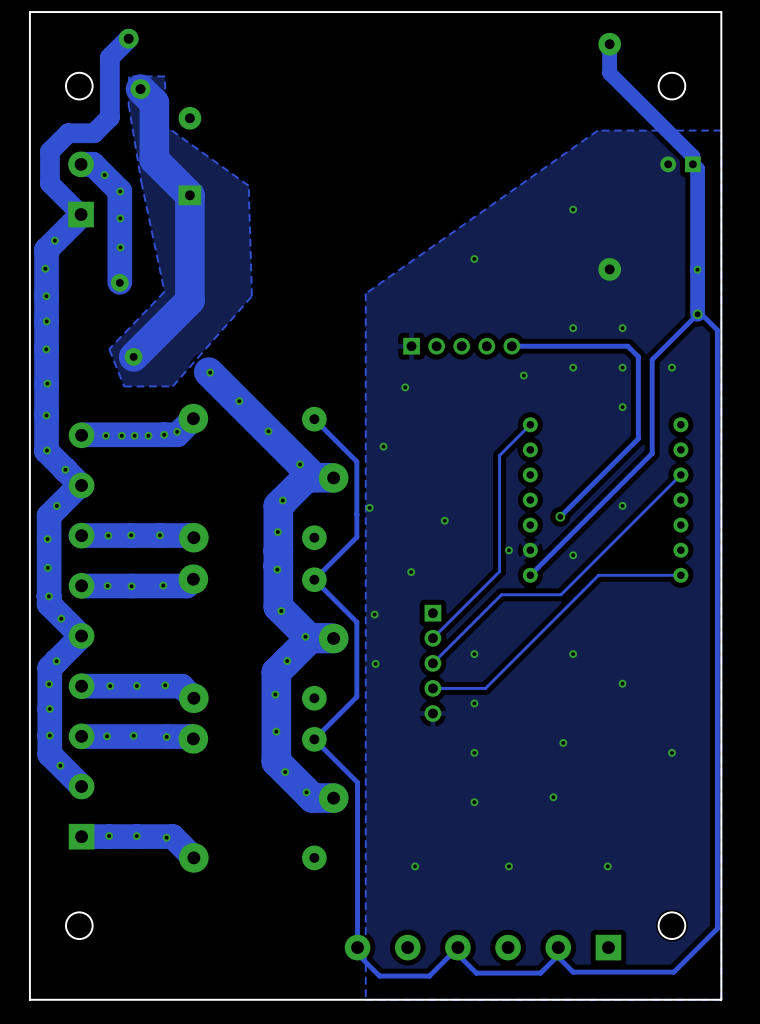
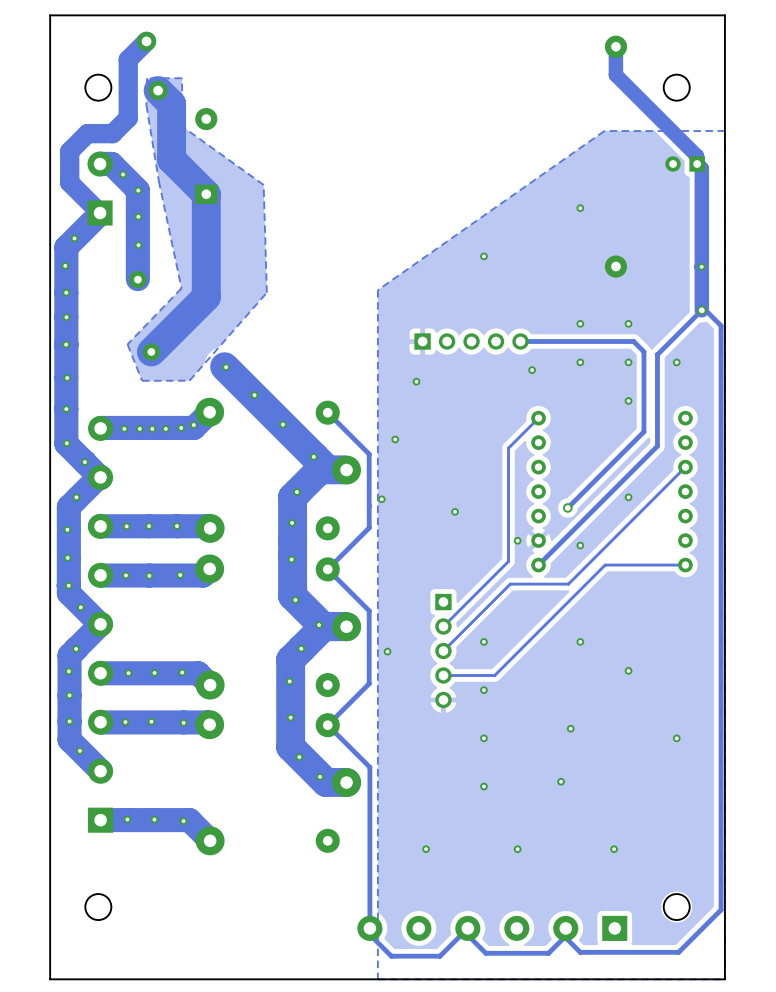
via: (411, 572) -> none
via: (374, 614) -> none

